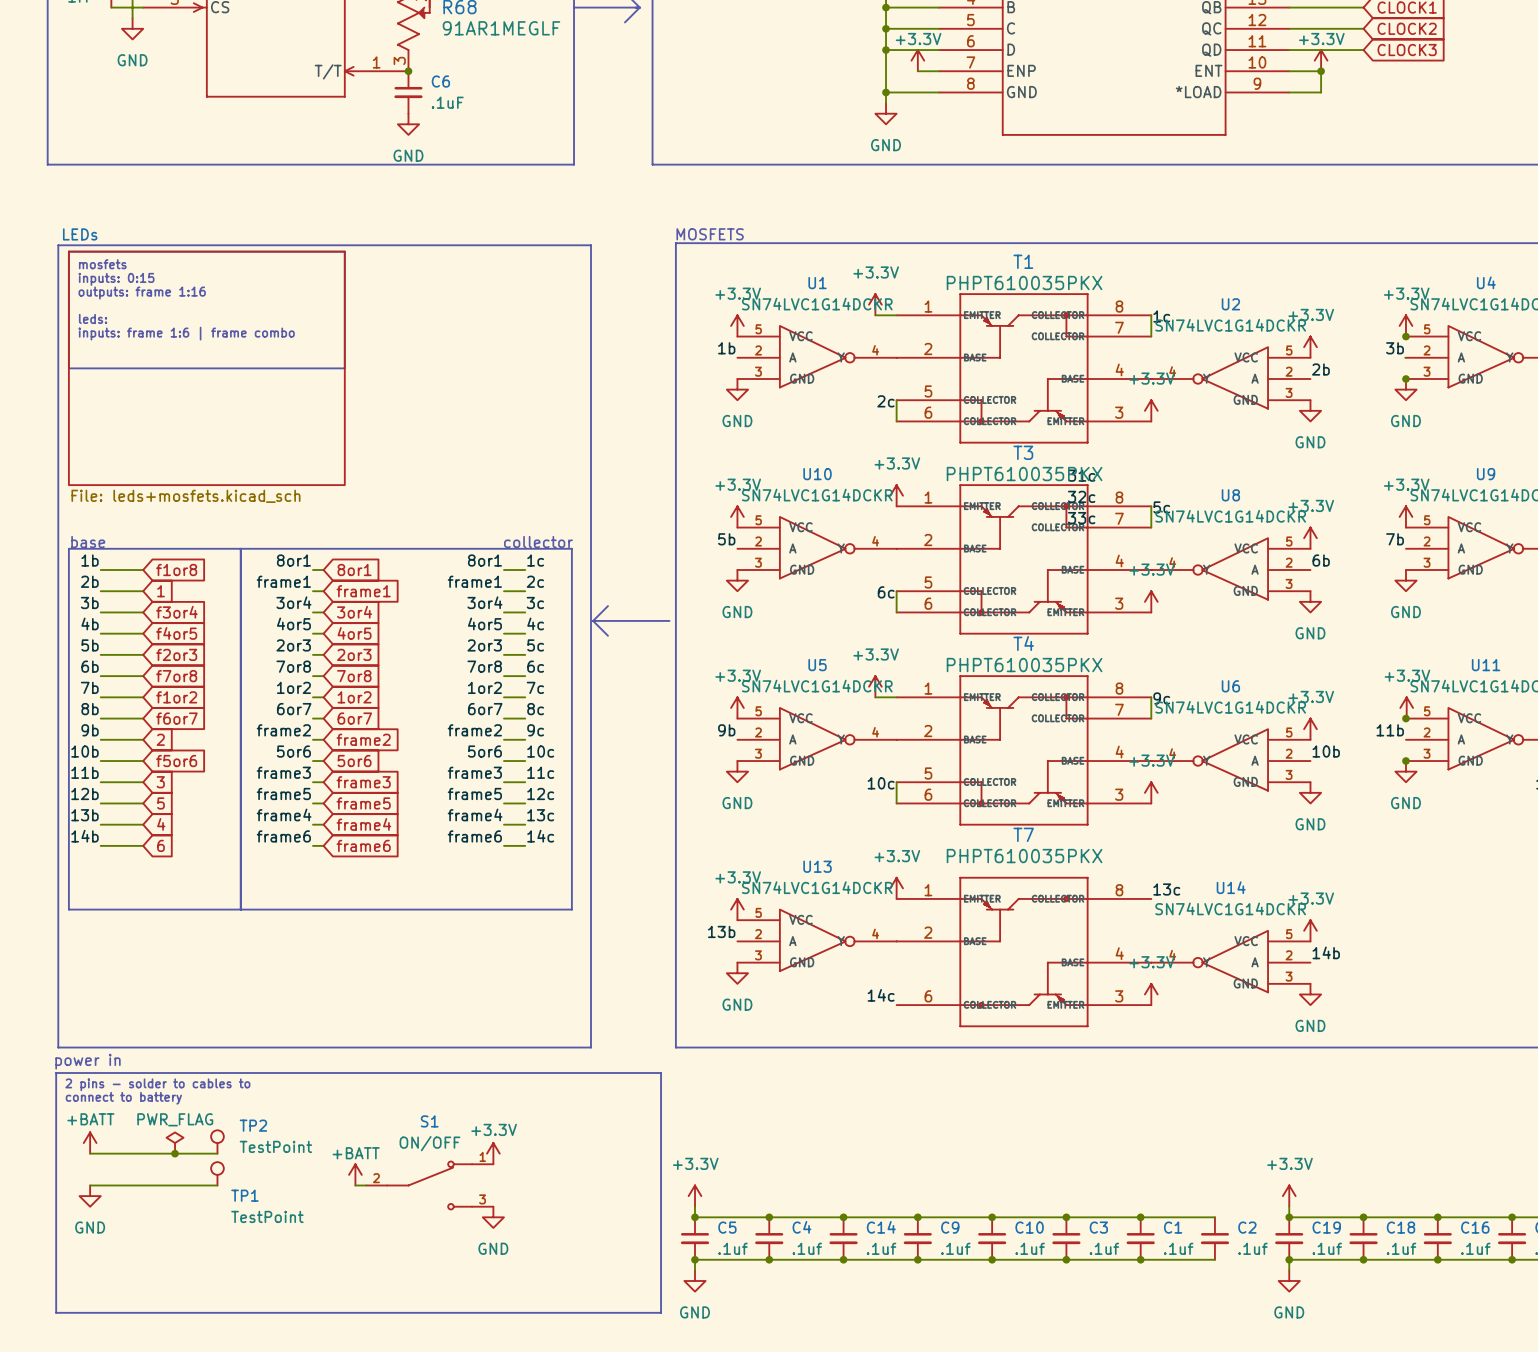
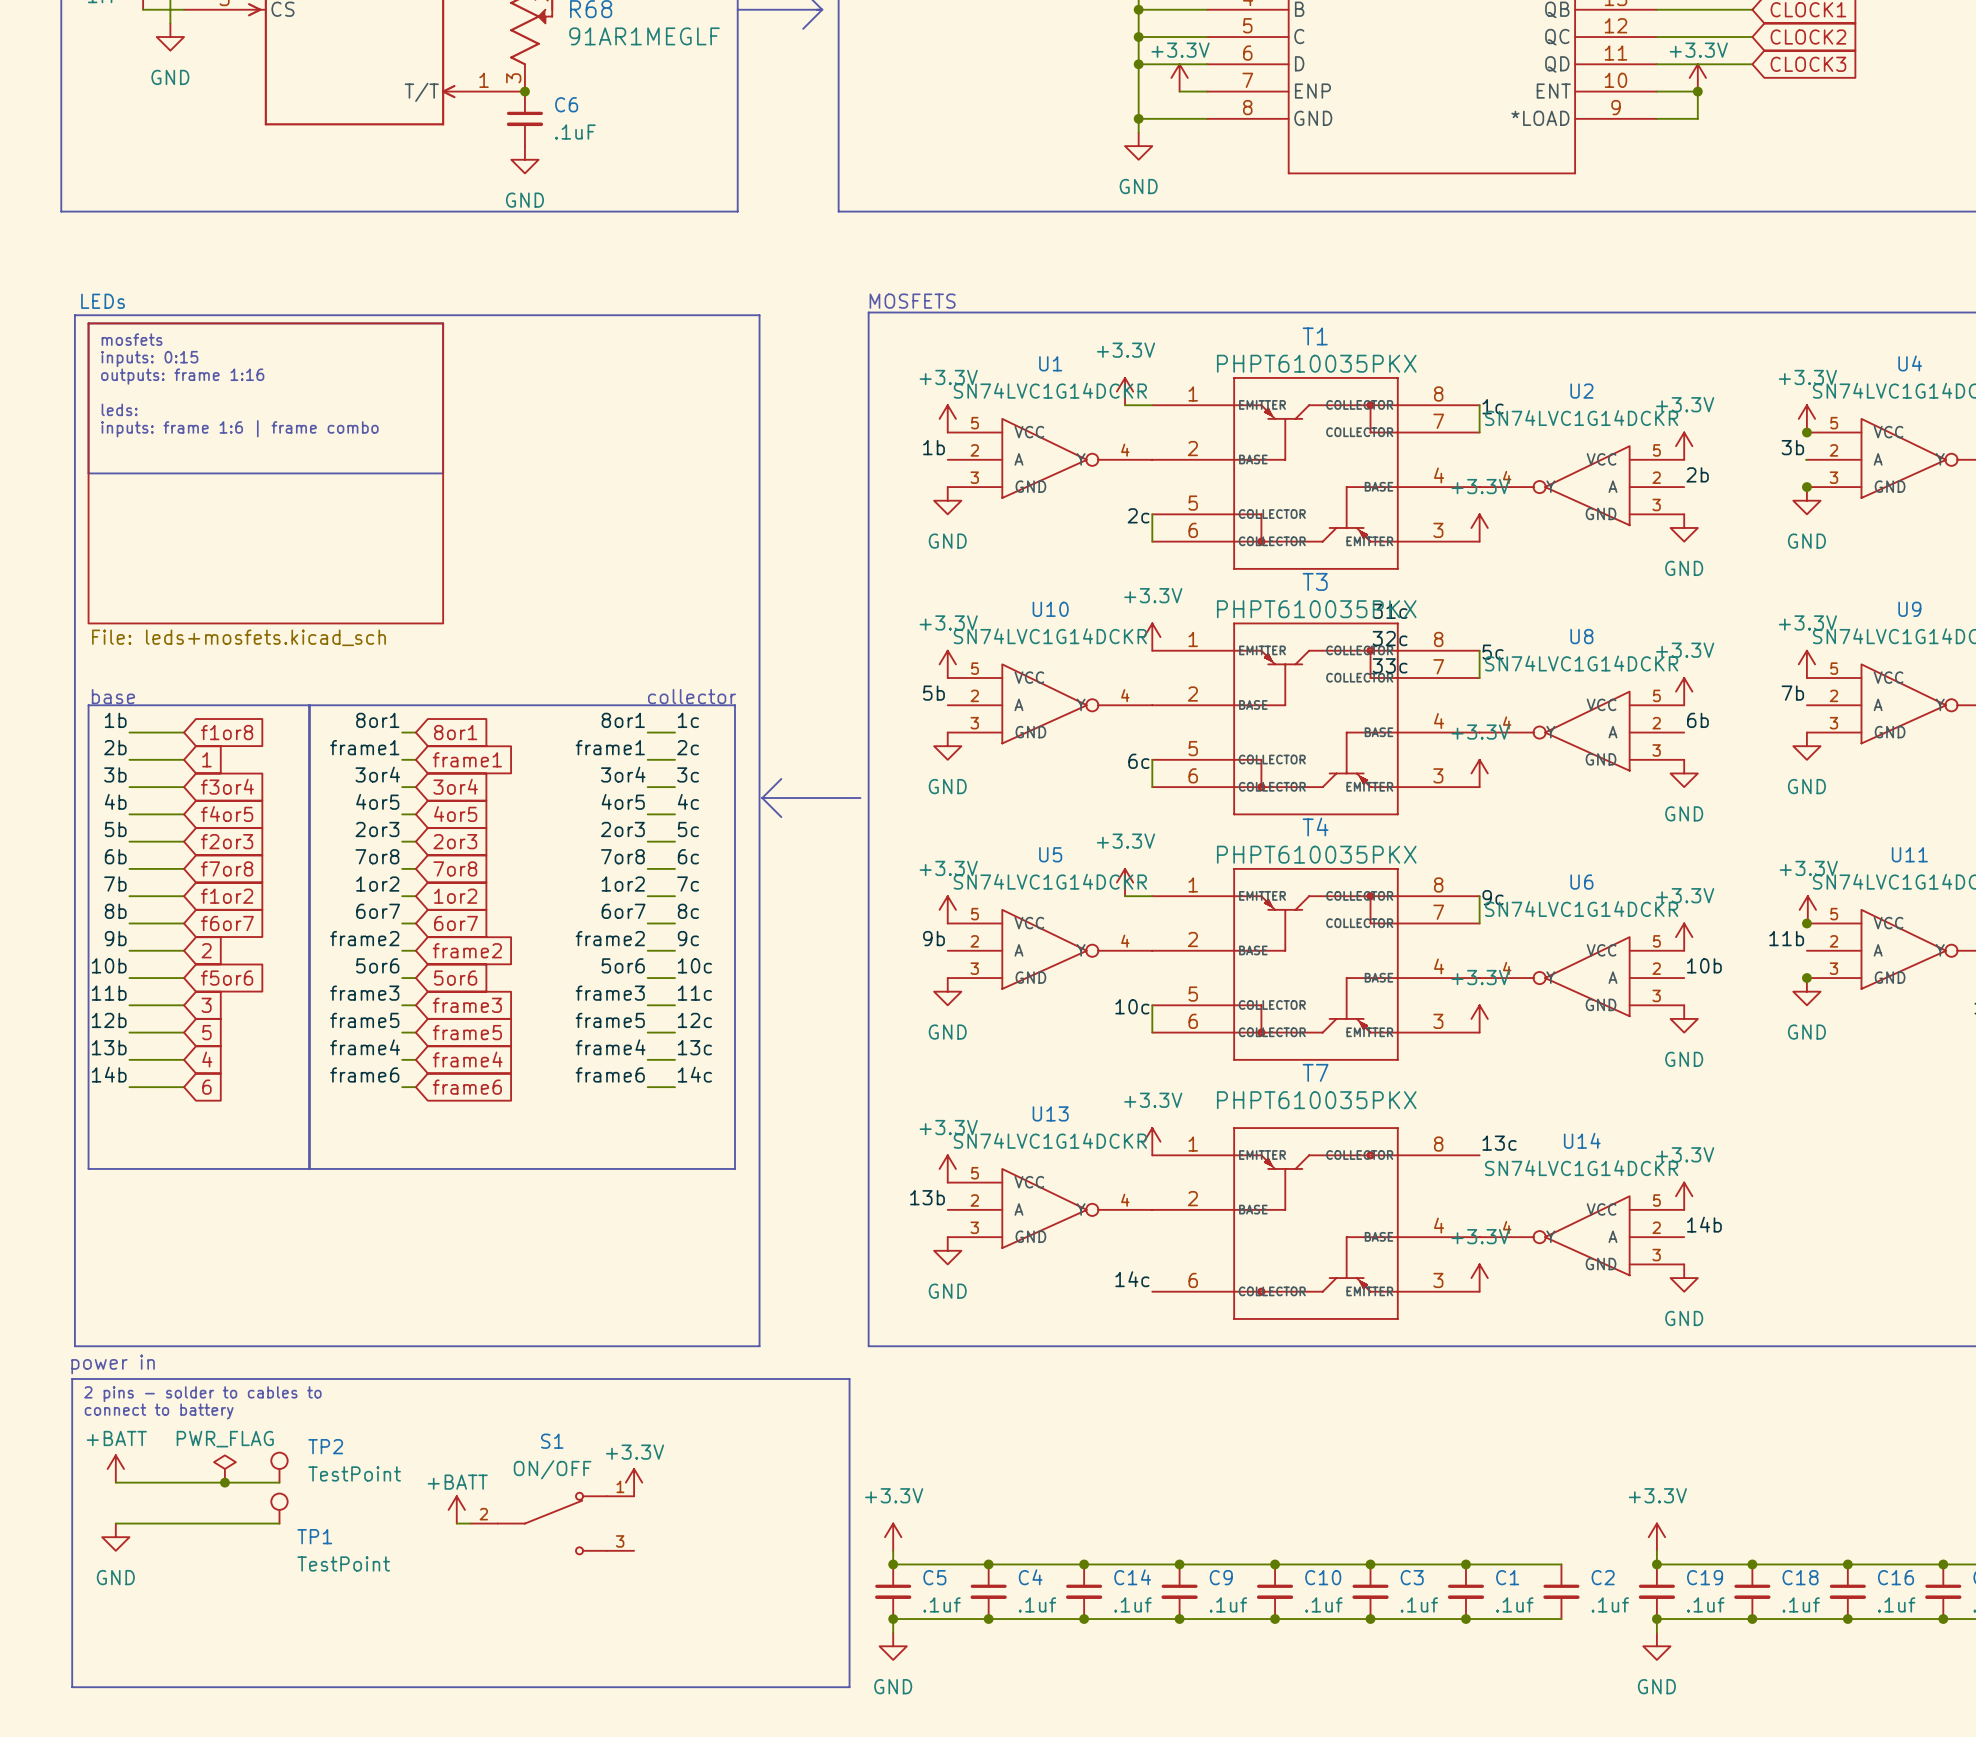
power symbol: GND (493, 1217) -> none

